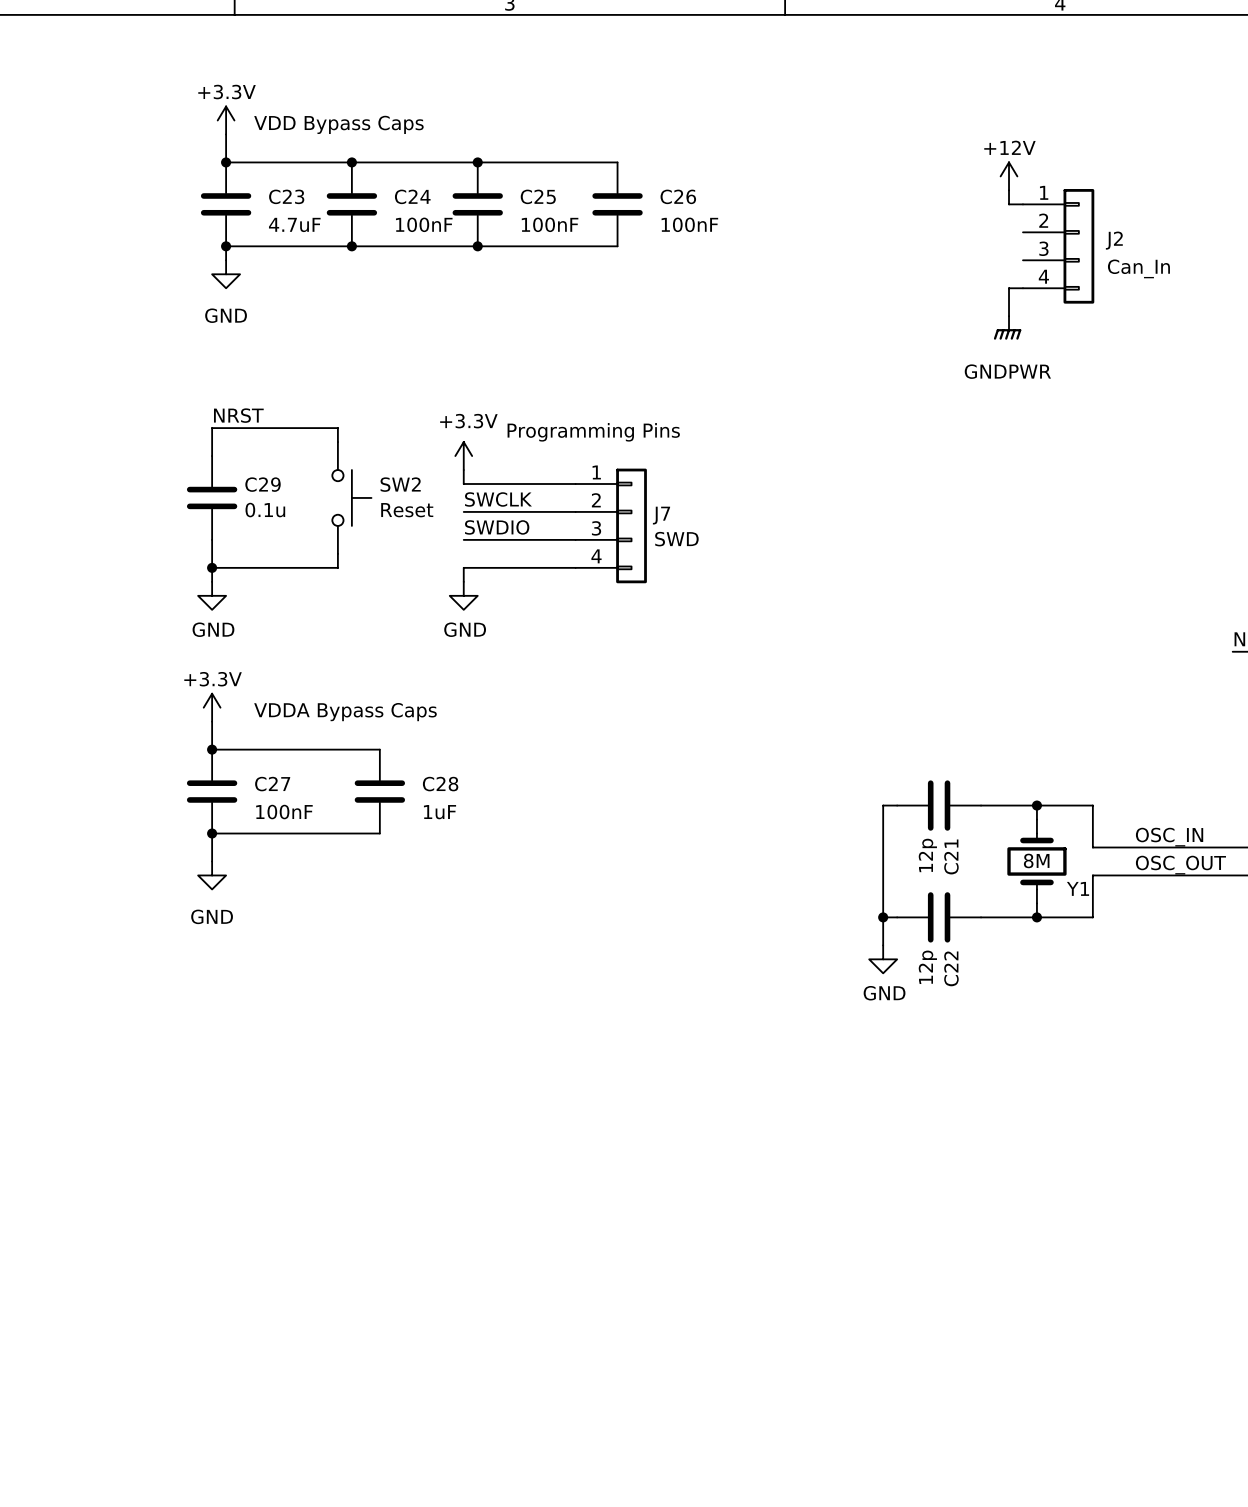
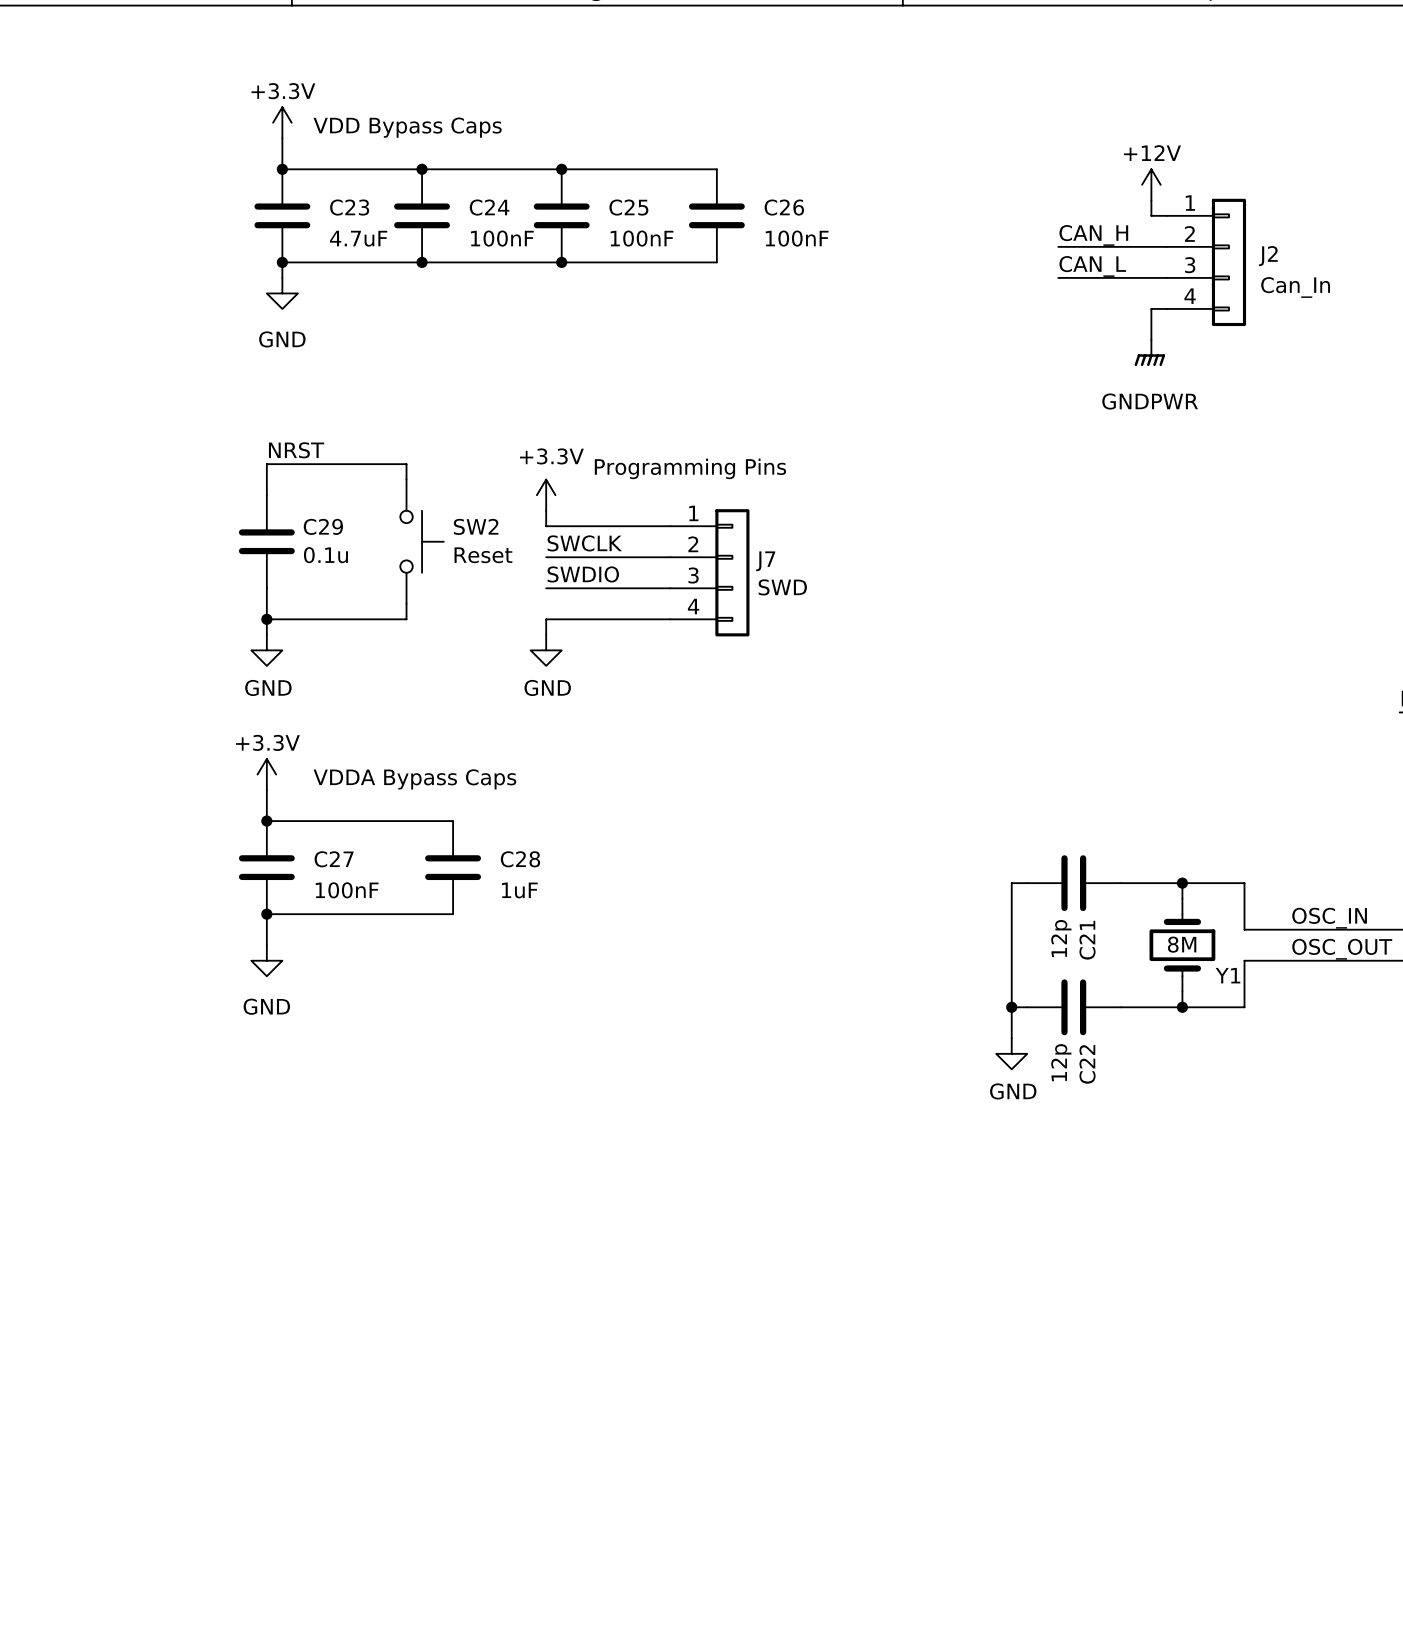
label: none -> CAN_H (1093, 235)
wire: none -> (1058, 246) (1166, 246)
label: none -> CAN_L (1092, 266)
wire: none -> (1058, 277) (1166, 277)

